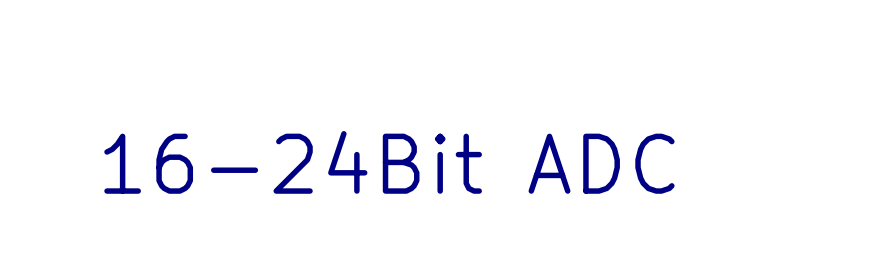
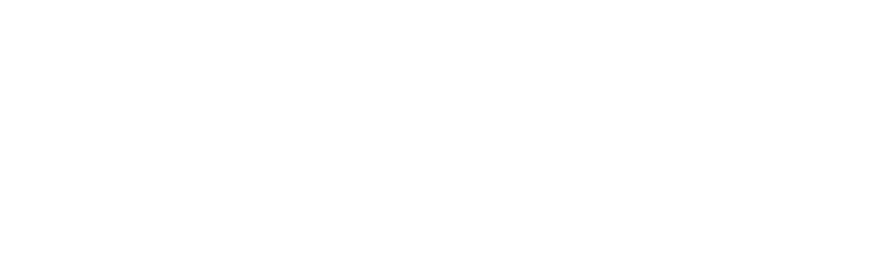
text: 16-24Bit ADC (389, 162) -> none

